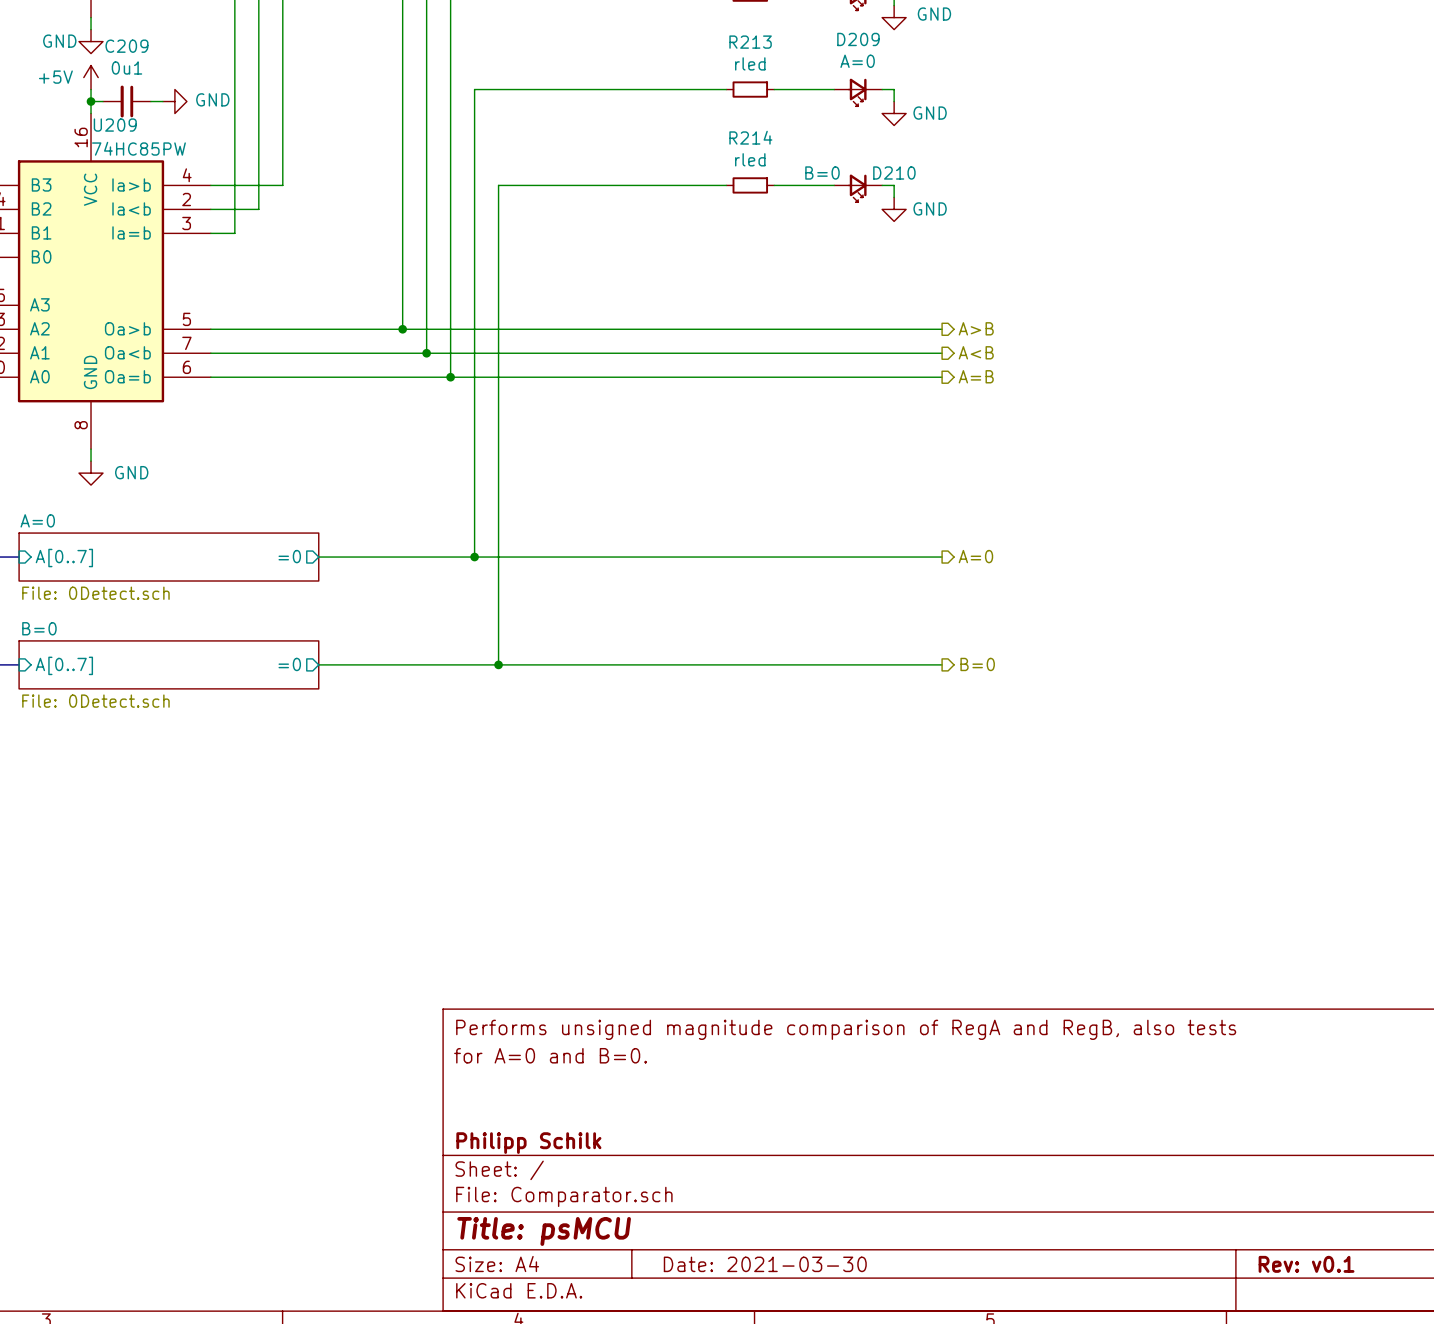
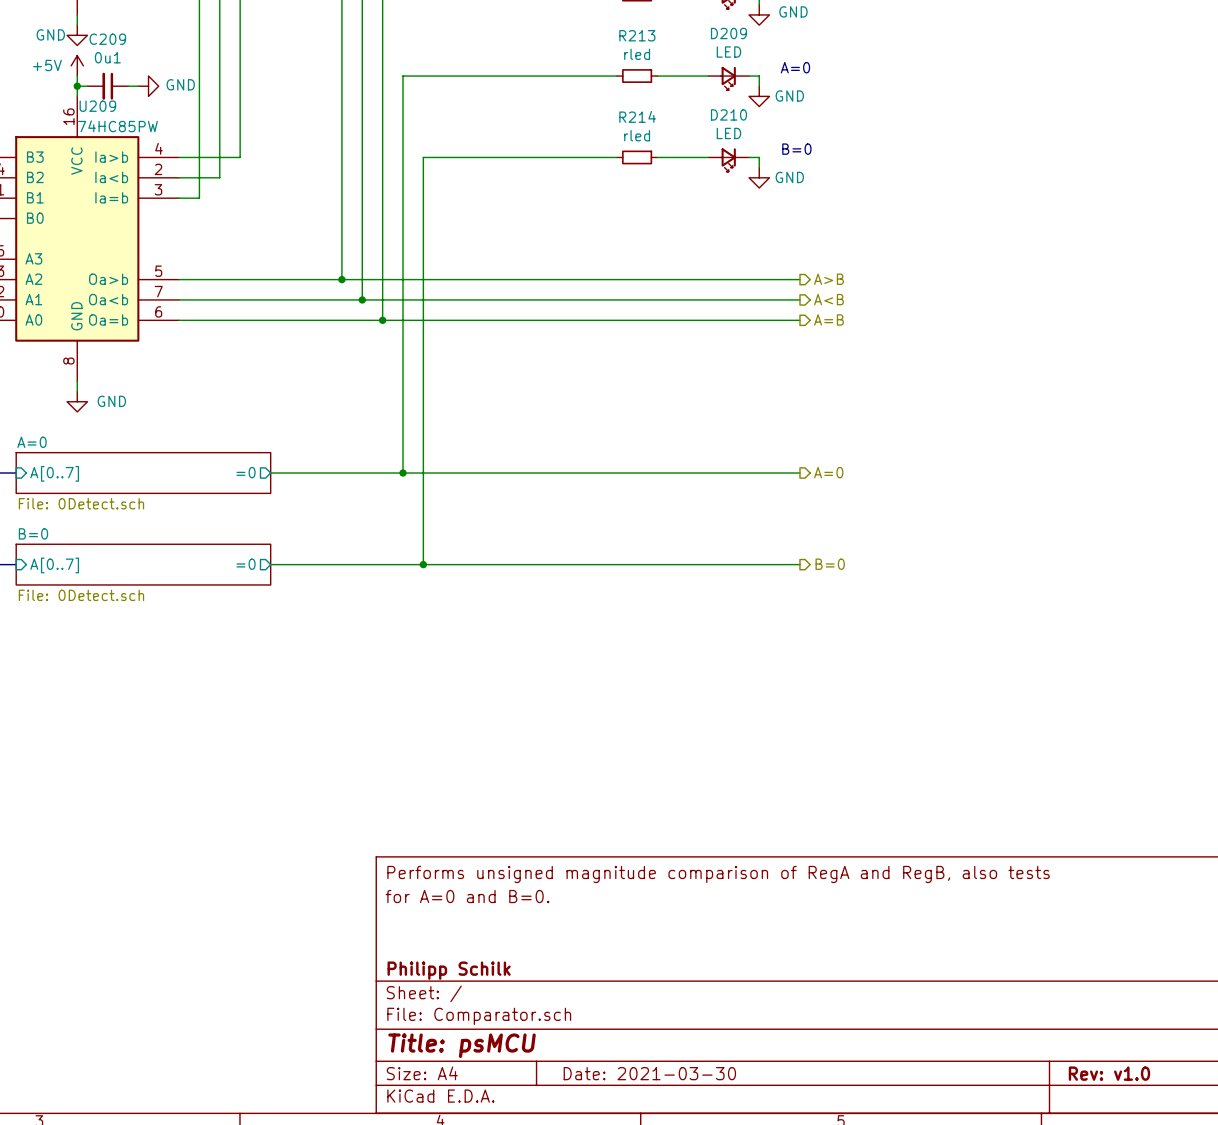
D209 value: A=0 (857, 61) -> LED (728, 52)
text: none -> A=0 (795, 67)
D210 value: B=0 (822, 173) -> LED (728, 133)
D210 name position: D210 (894, 173) -> D210 (728, 114)
text: none -> B=0 (796, 149)
title block: Rev: v0.1 (1306, 1264) -> Rev: v1.0 (1109, 1073)

